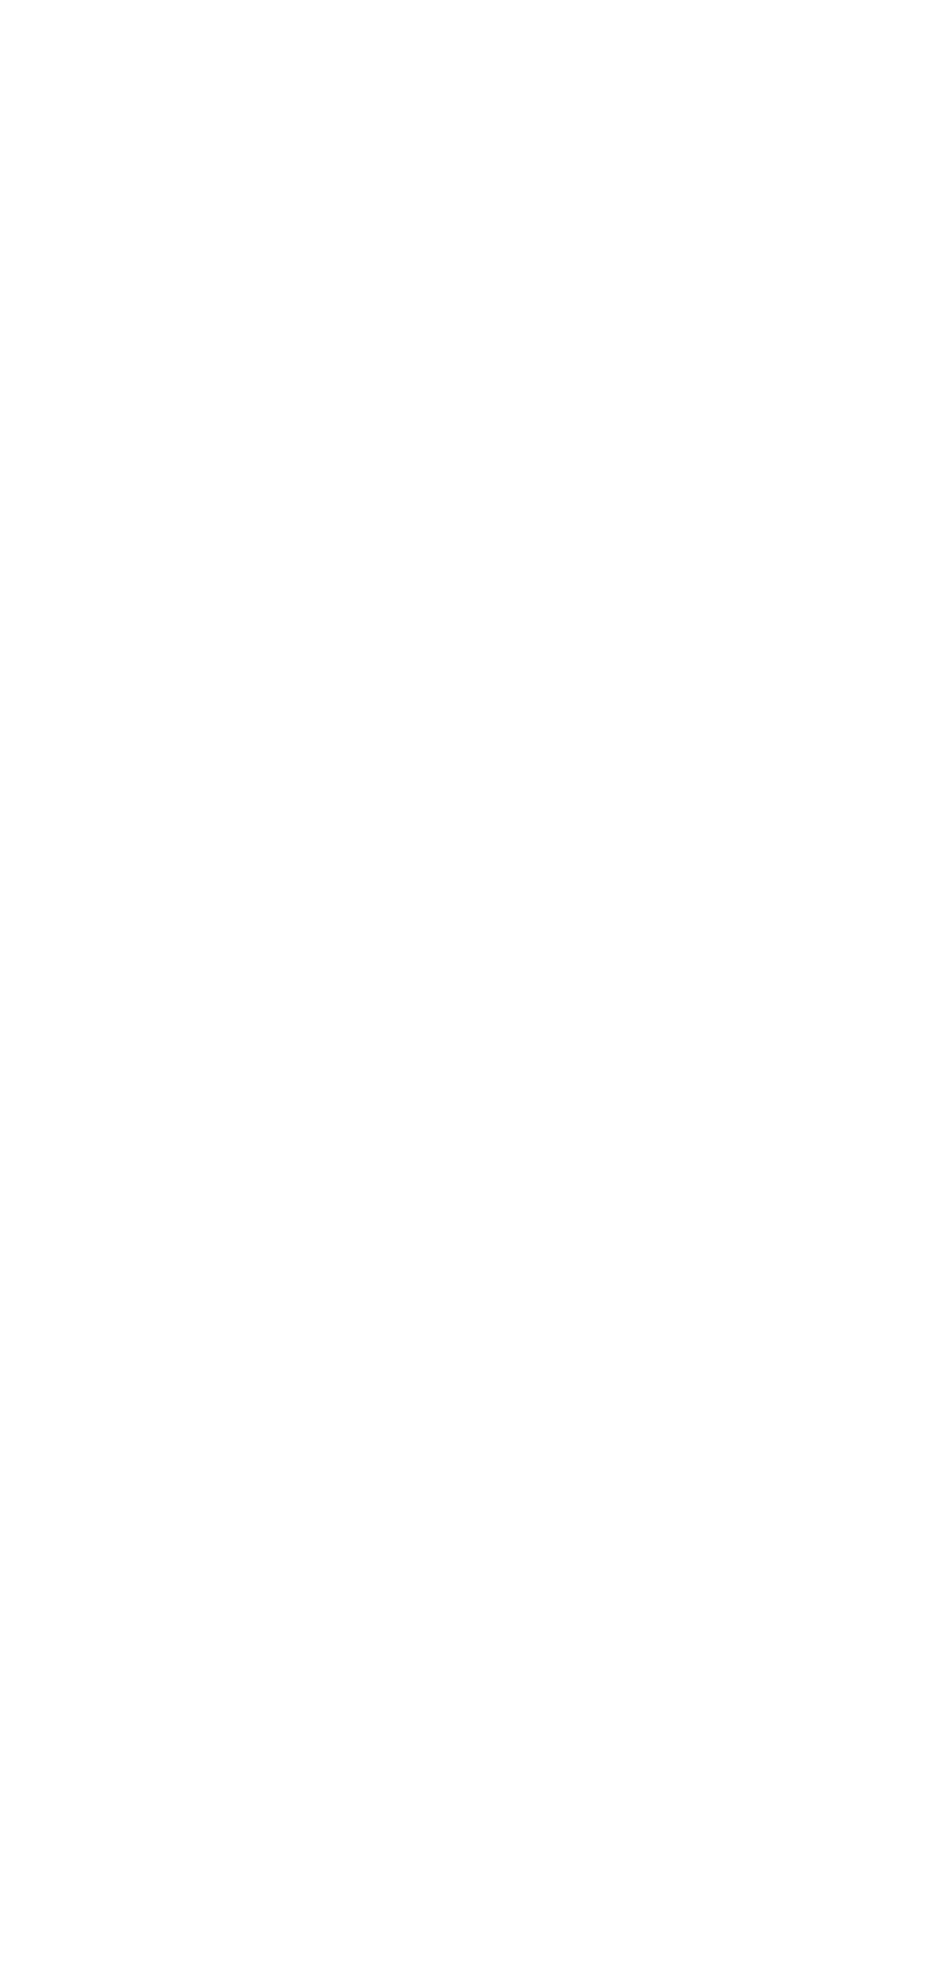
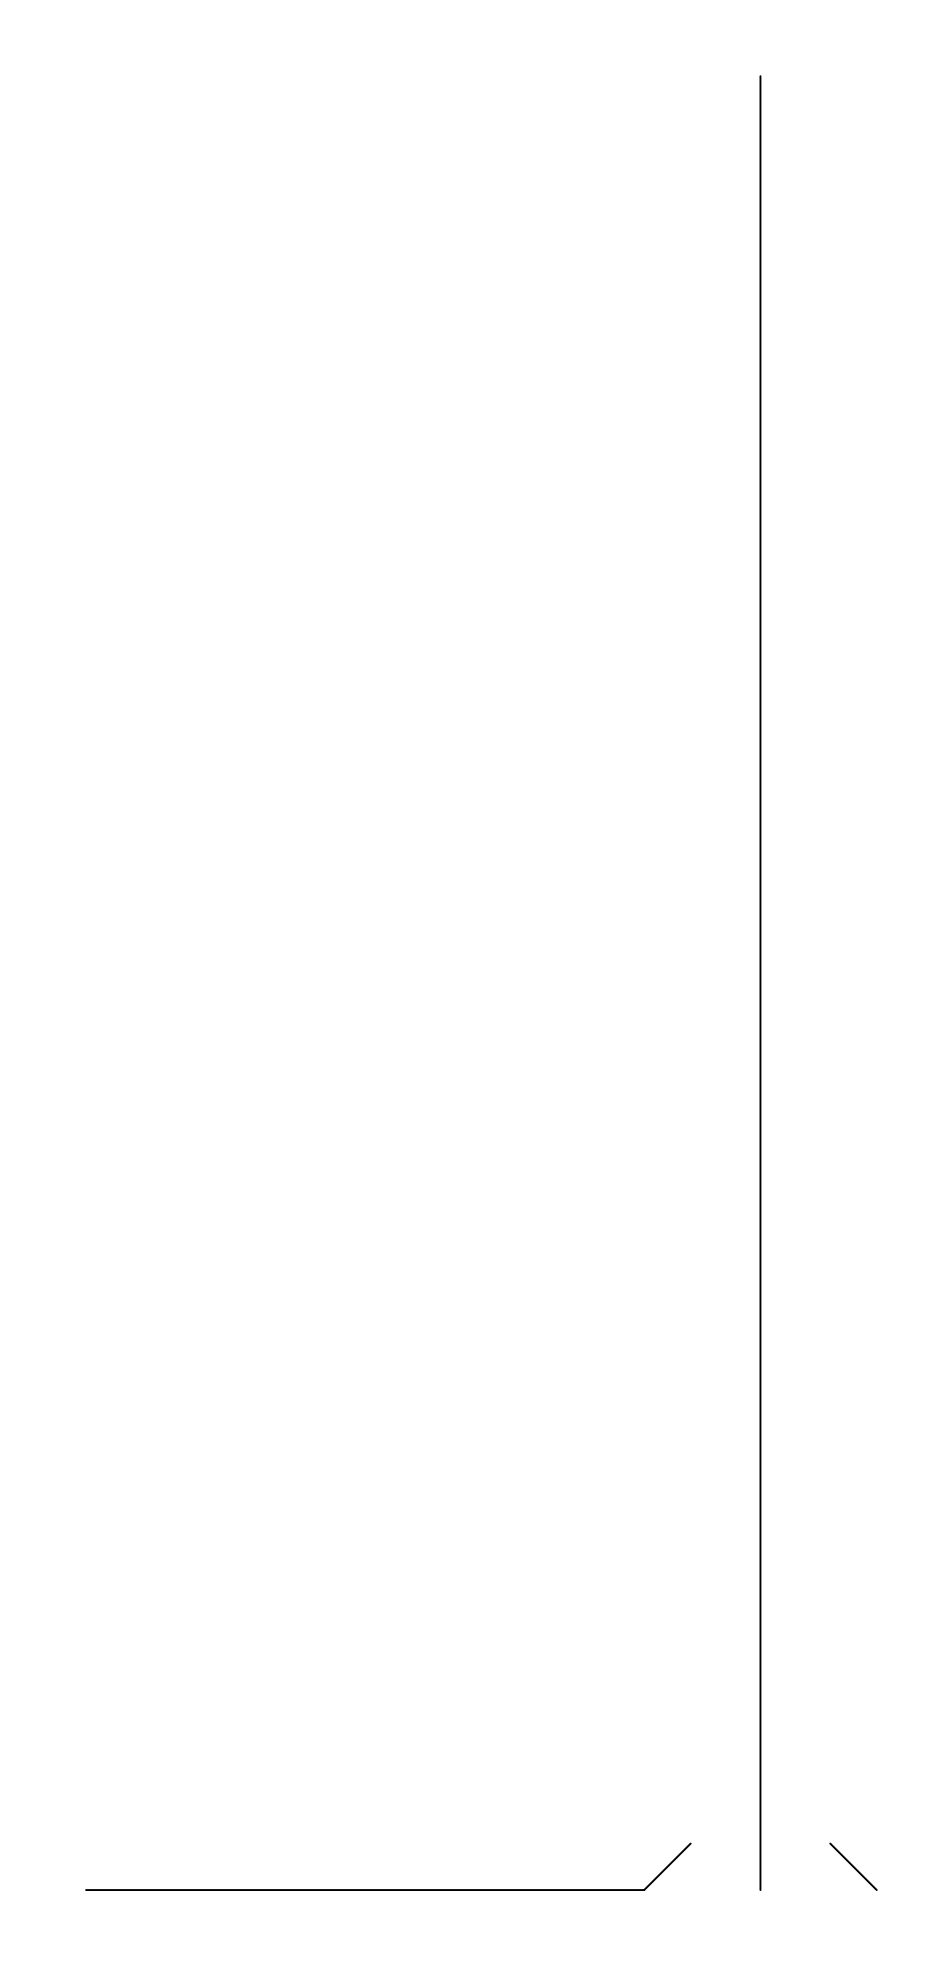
bus: none -> (760, 76) (760, 1890)
bus: none -> (690, 1843) (644, 1890) (86, 1890)
bus: none -> (830, 1843) (876, 1890)

